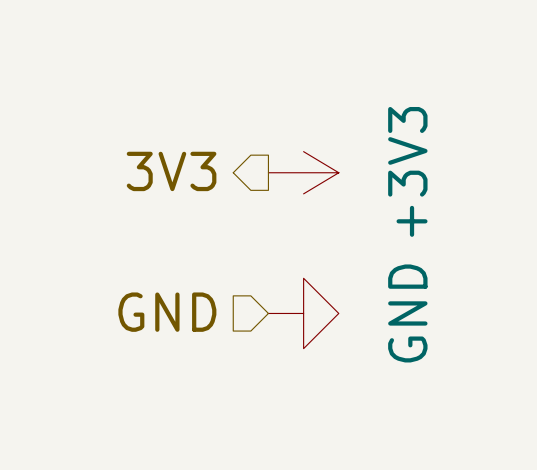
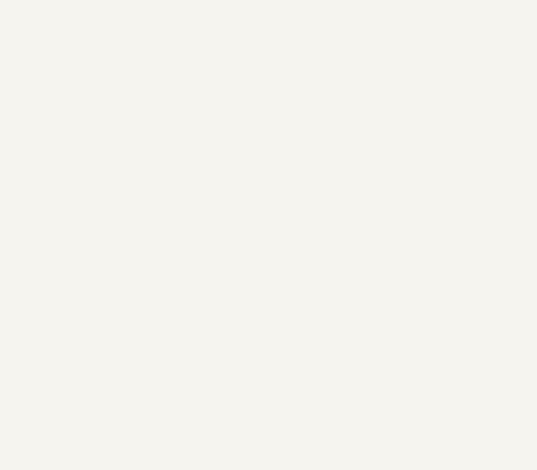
hierarchical label: 3V3 (171, 171) -> none
power symbol: +3V3 (303, 172) -> none
hierarchical label: GND (167, 312) -> none
power symbol: GND (303, 313) -> none

